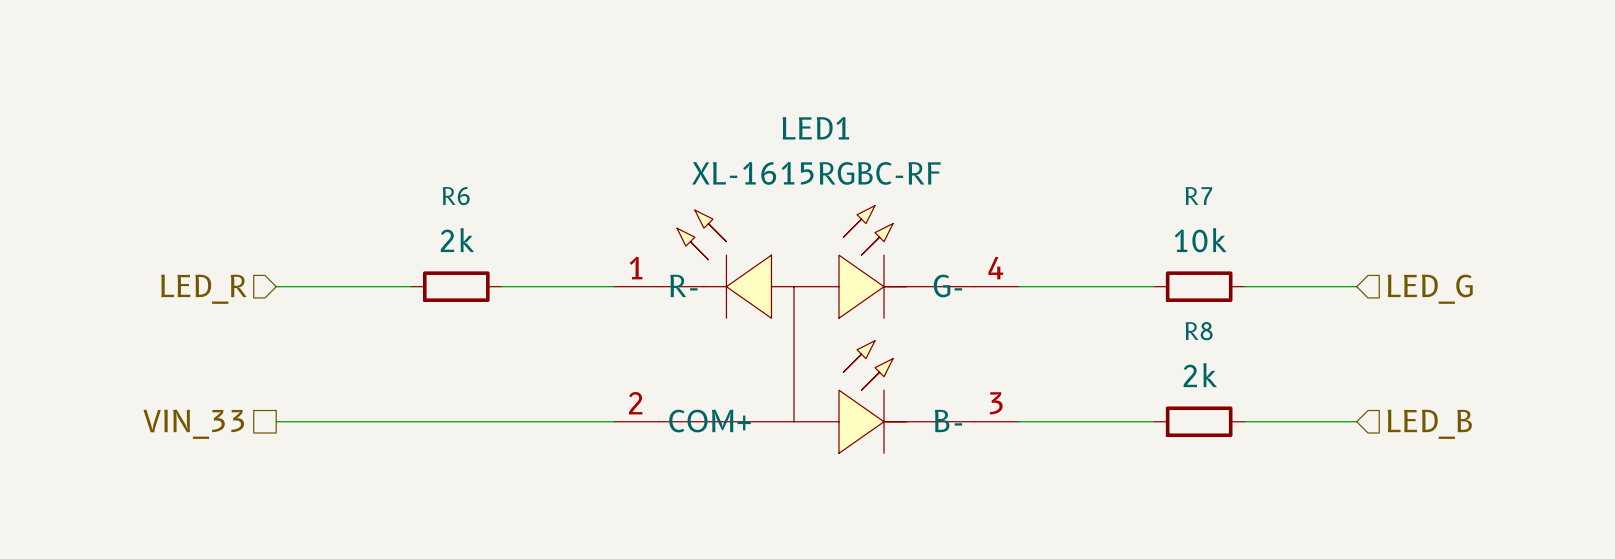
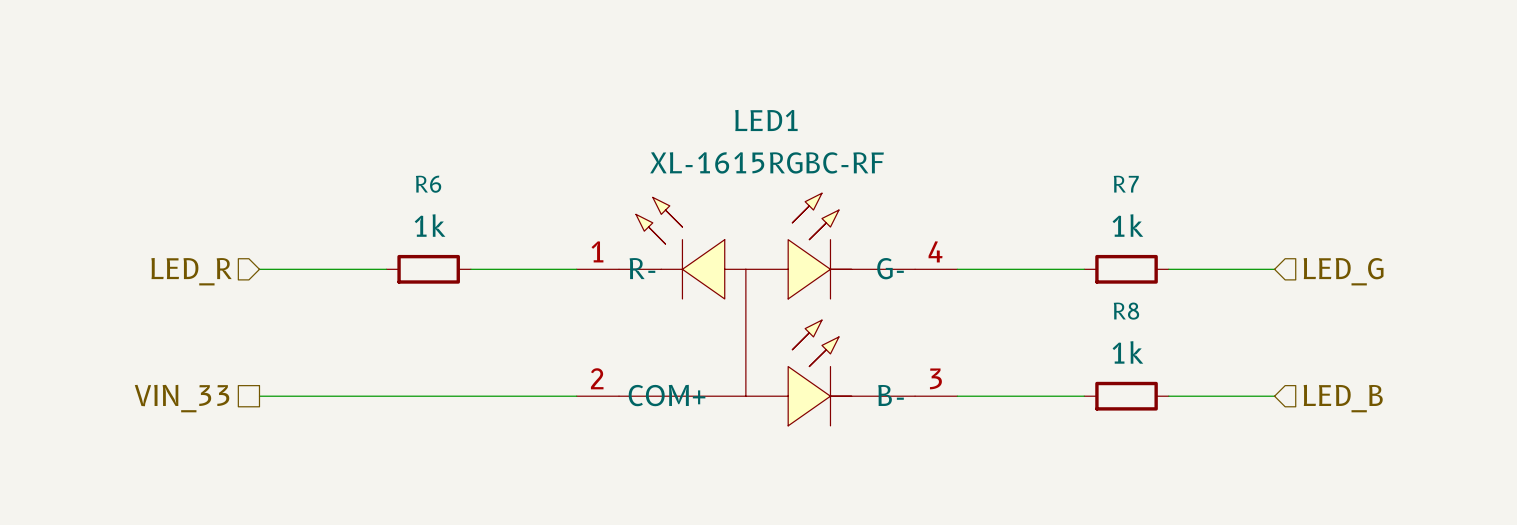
R6 value: 2k (457, 240) -> 1k (430, 225)
R7 value: 10k (1200, 240) -> 1k (1127, 225)
R8 value: 2k (1200, 375) -> 1k (1127, 352)

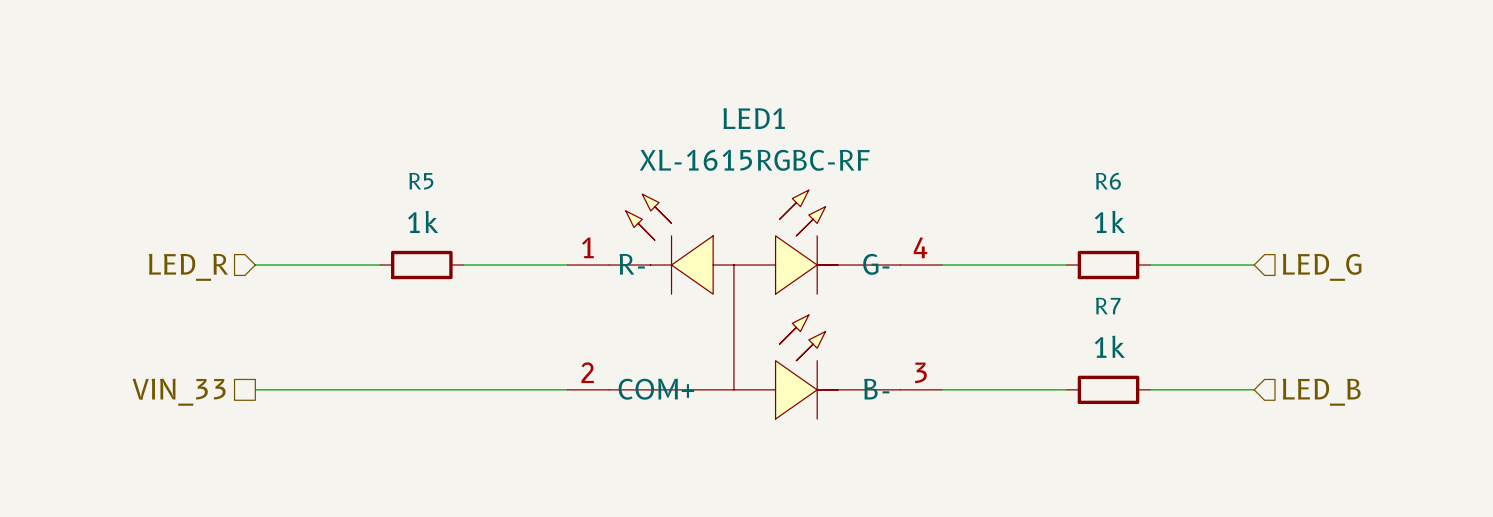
R6 name: R6 (428, 184) -> R5 (421, 181)
R7 name: R7 (1126, 184) -> R6 (1108, 181)
R8 name: R8 (1126, 311) -> R7 (1108, 306)

